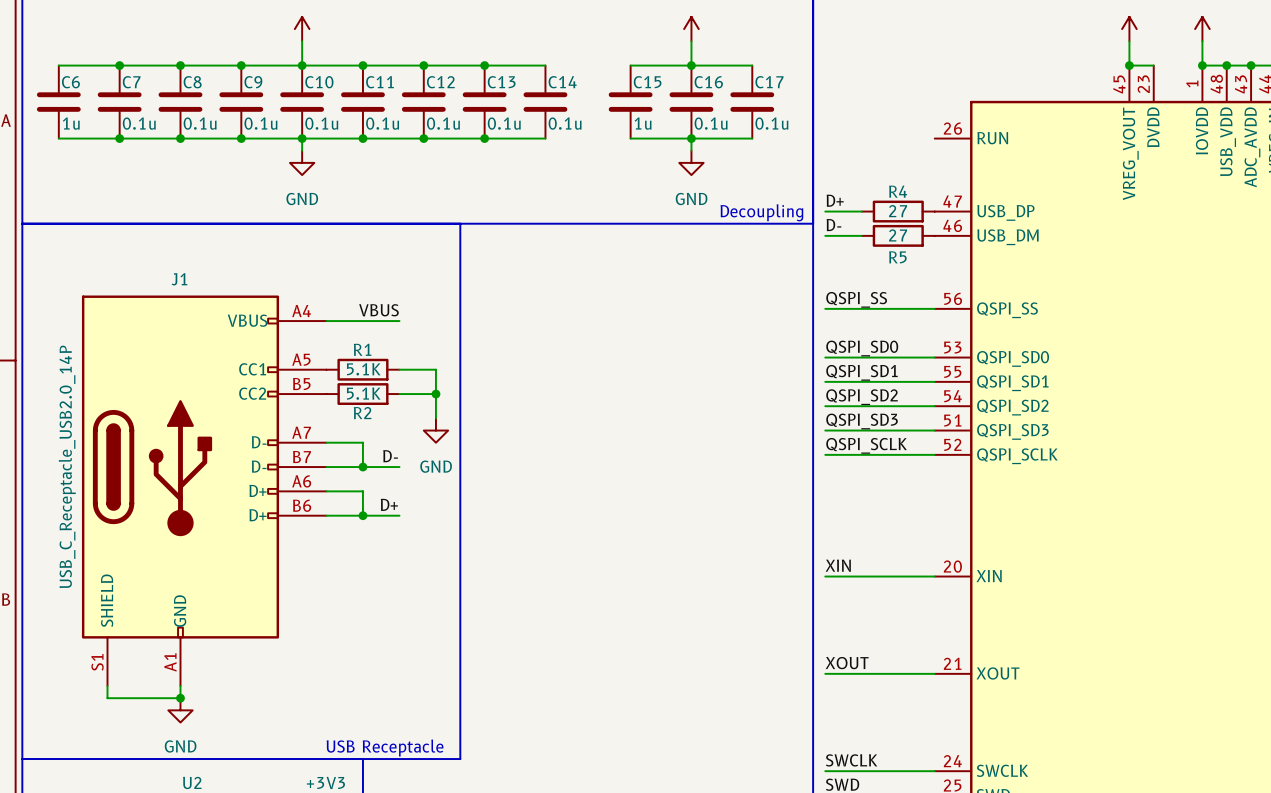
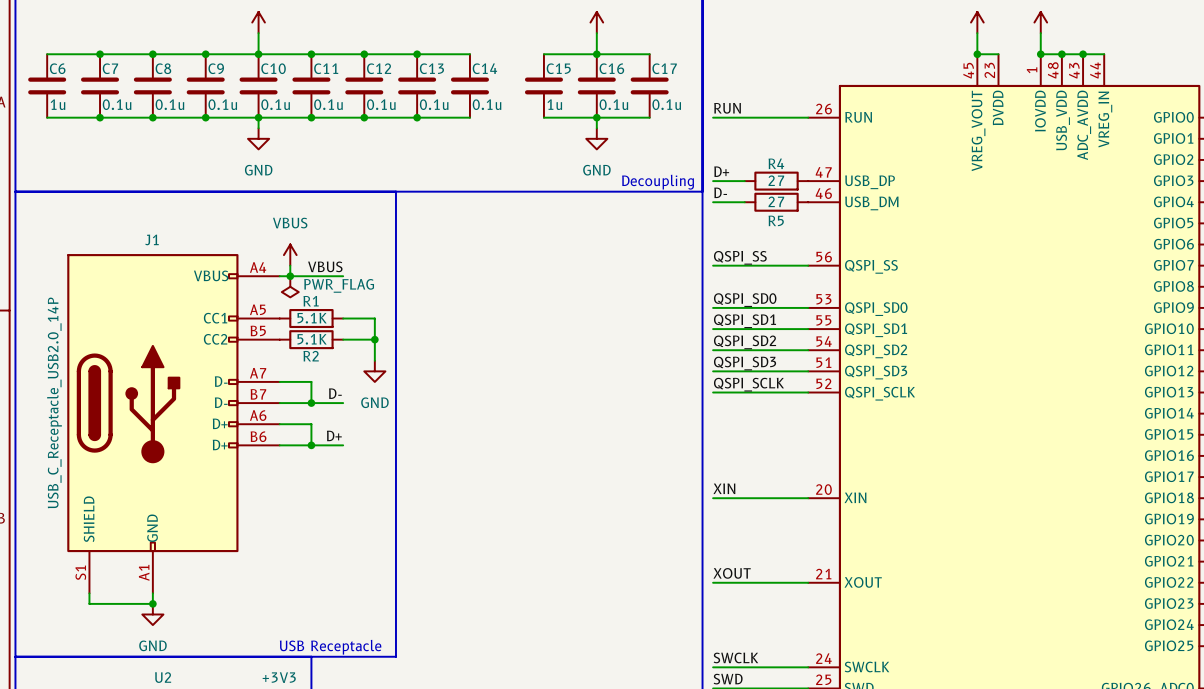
label: none -> RUN (727, 108)
wire: none -> (713, 117) (808, 117)
power symbol: none -> VBUS (290, 255)
wire: none -> (290, 265) (290, 276)
junction: none -> (290, 276)
power symbol: none -> PWR_FLAG (290, 286)

